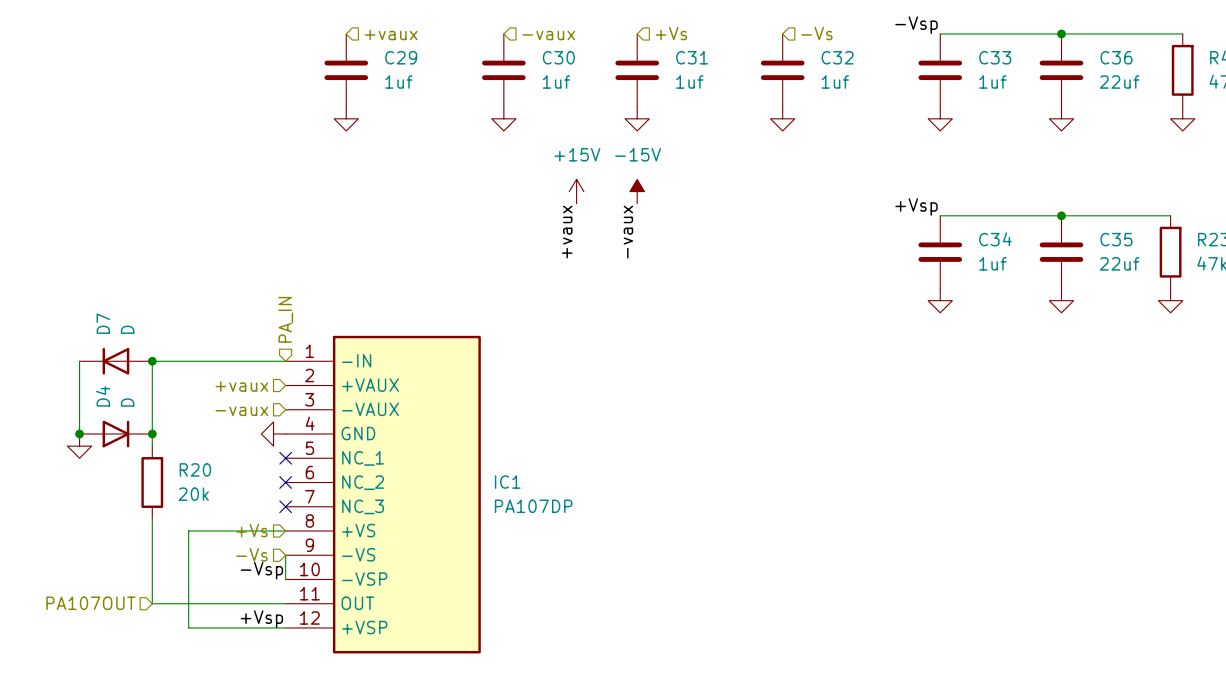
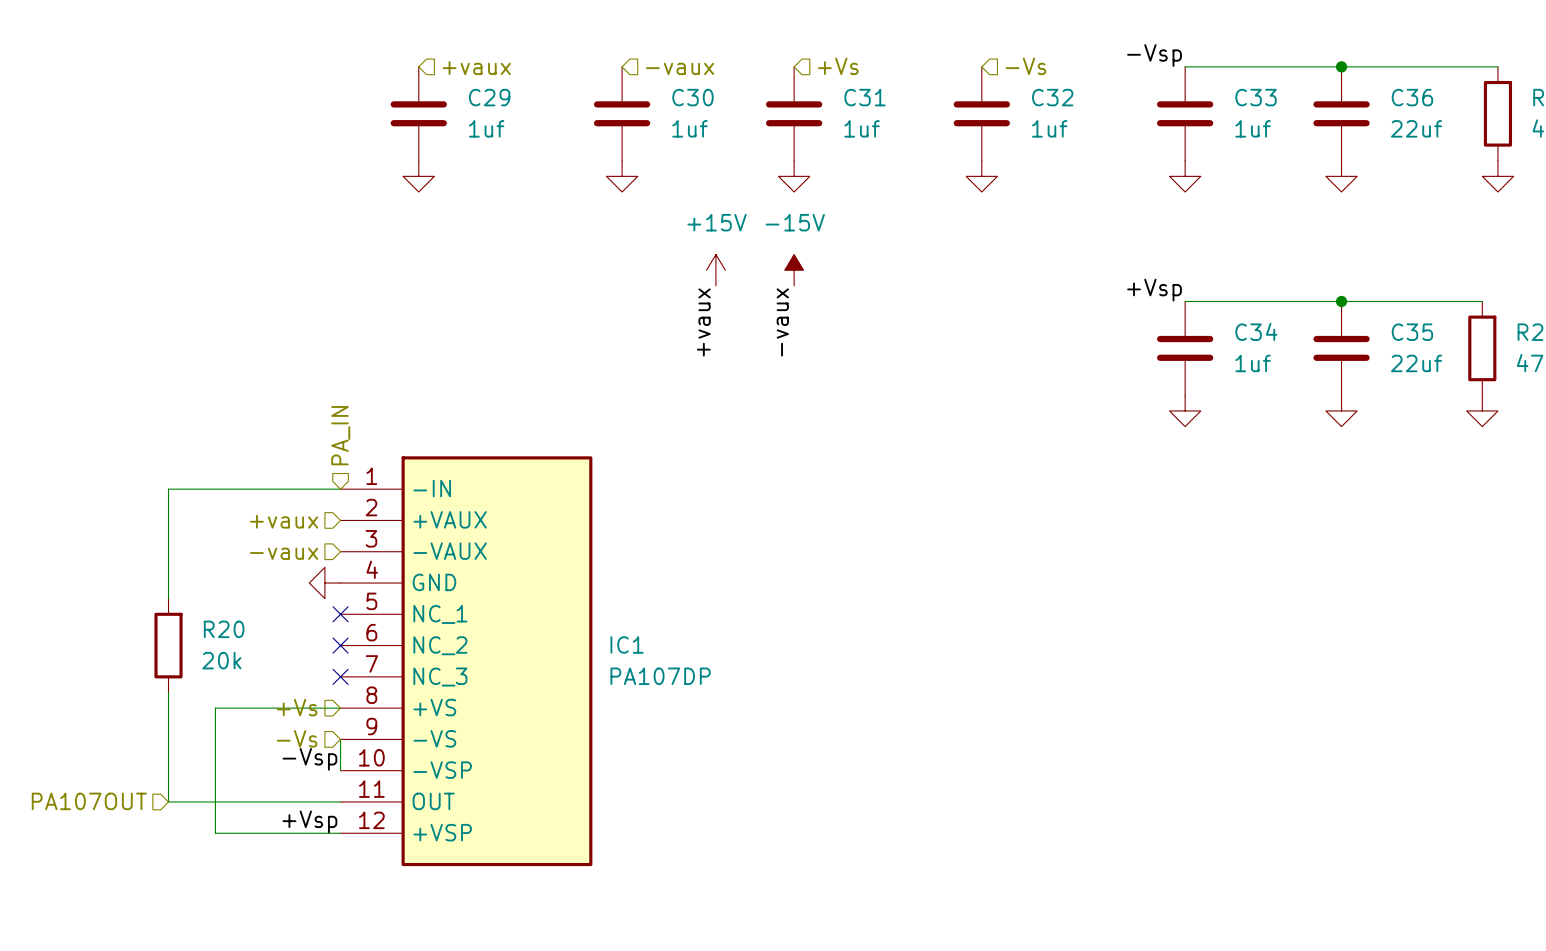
wire: (79, 361) (79, 434) -> none
D7: D (115, 361) -> none
junction: (152, 361) -> none
junction: (79, 434) -> none
D4: D (115, 434) -> none
junction: (152, 434) -> none
power symbol: (79, 446) -> none

